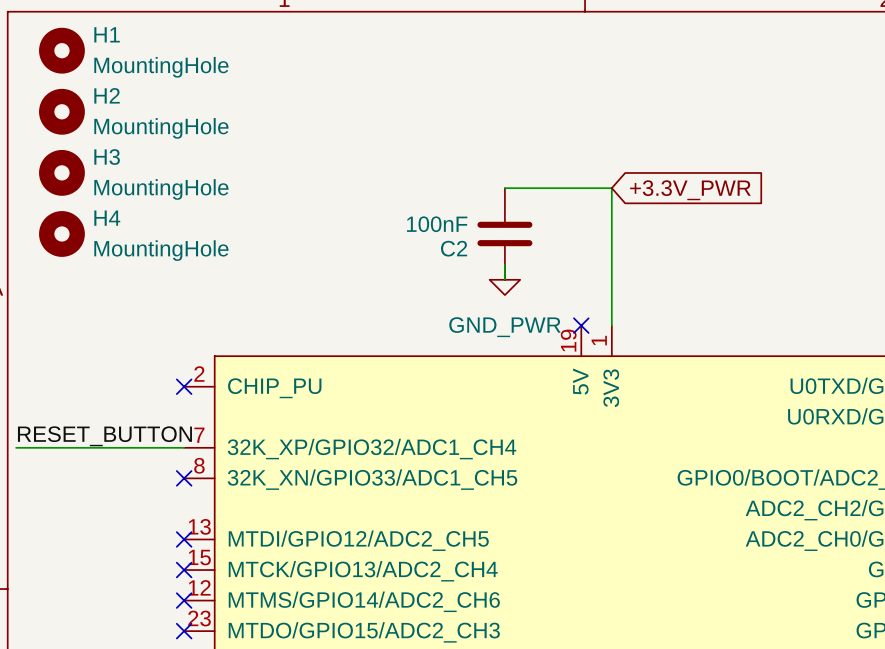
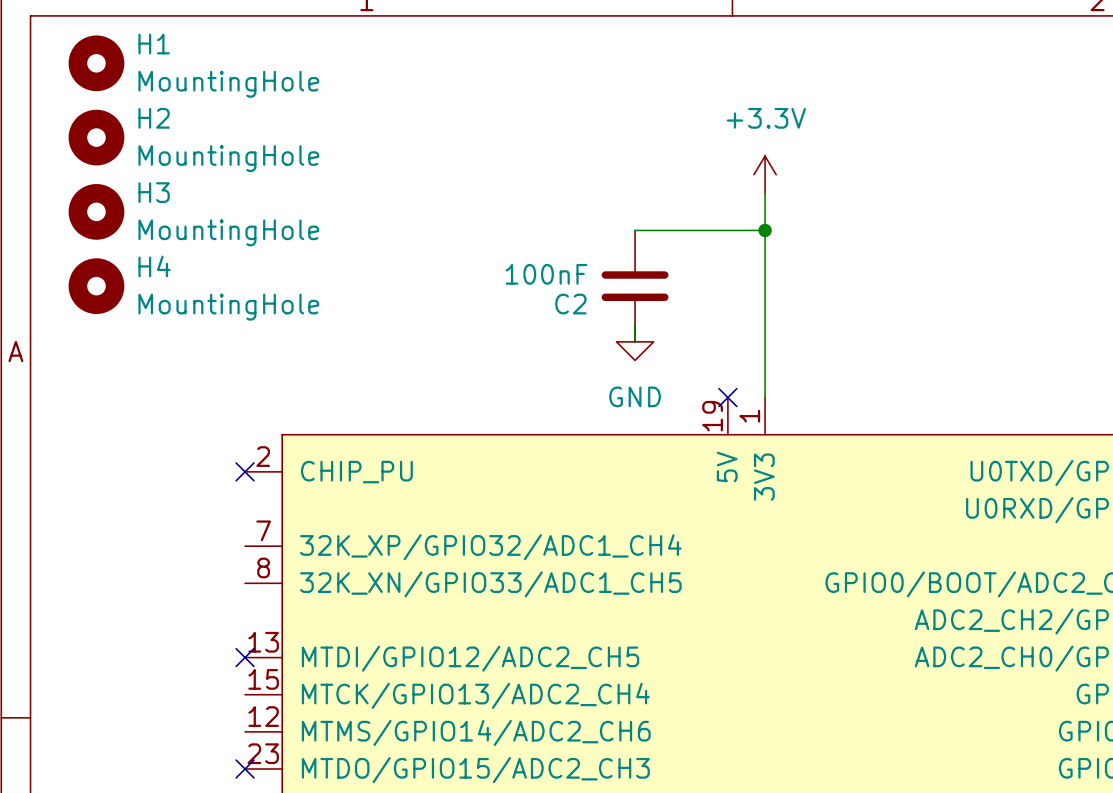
power symbol: none -> +3.3V (765, 174)
wire: none -> (765, 193) (765, 230)
junction: none -> (765, 230)
global label: +3.3V_PWR (690, 190) -> none
power symbol: GND_PWR (504, 279) -> GND (635, 341)
label: RESET_BUTTON (104, 436) -> none
wire: (16, 447) (184, 447) -> none
no-connect mark: (184, 478) -> none
no-connect mark: (184, 570) -> none
no-connect mark: (184, 600) -> none

